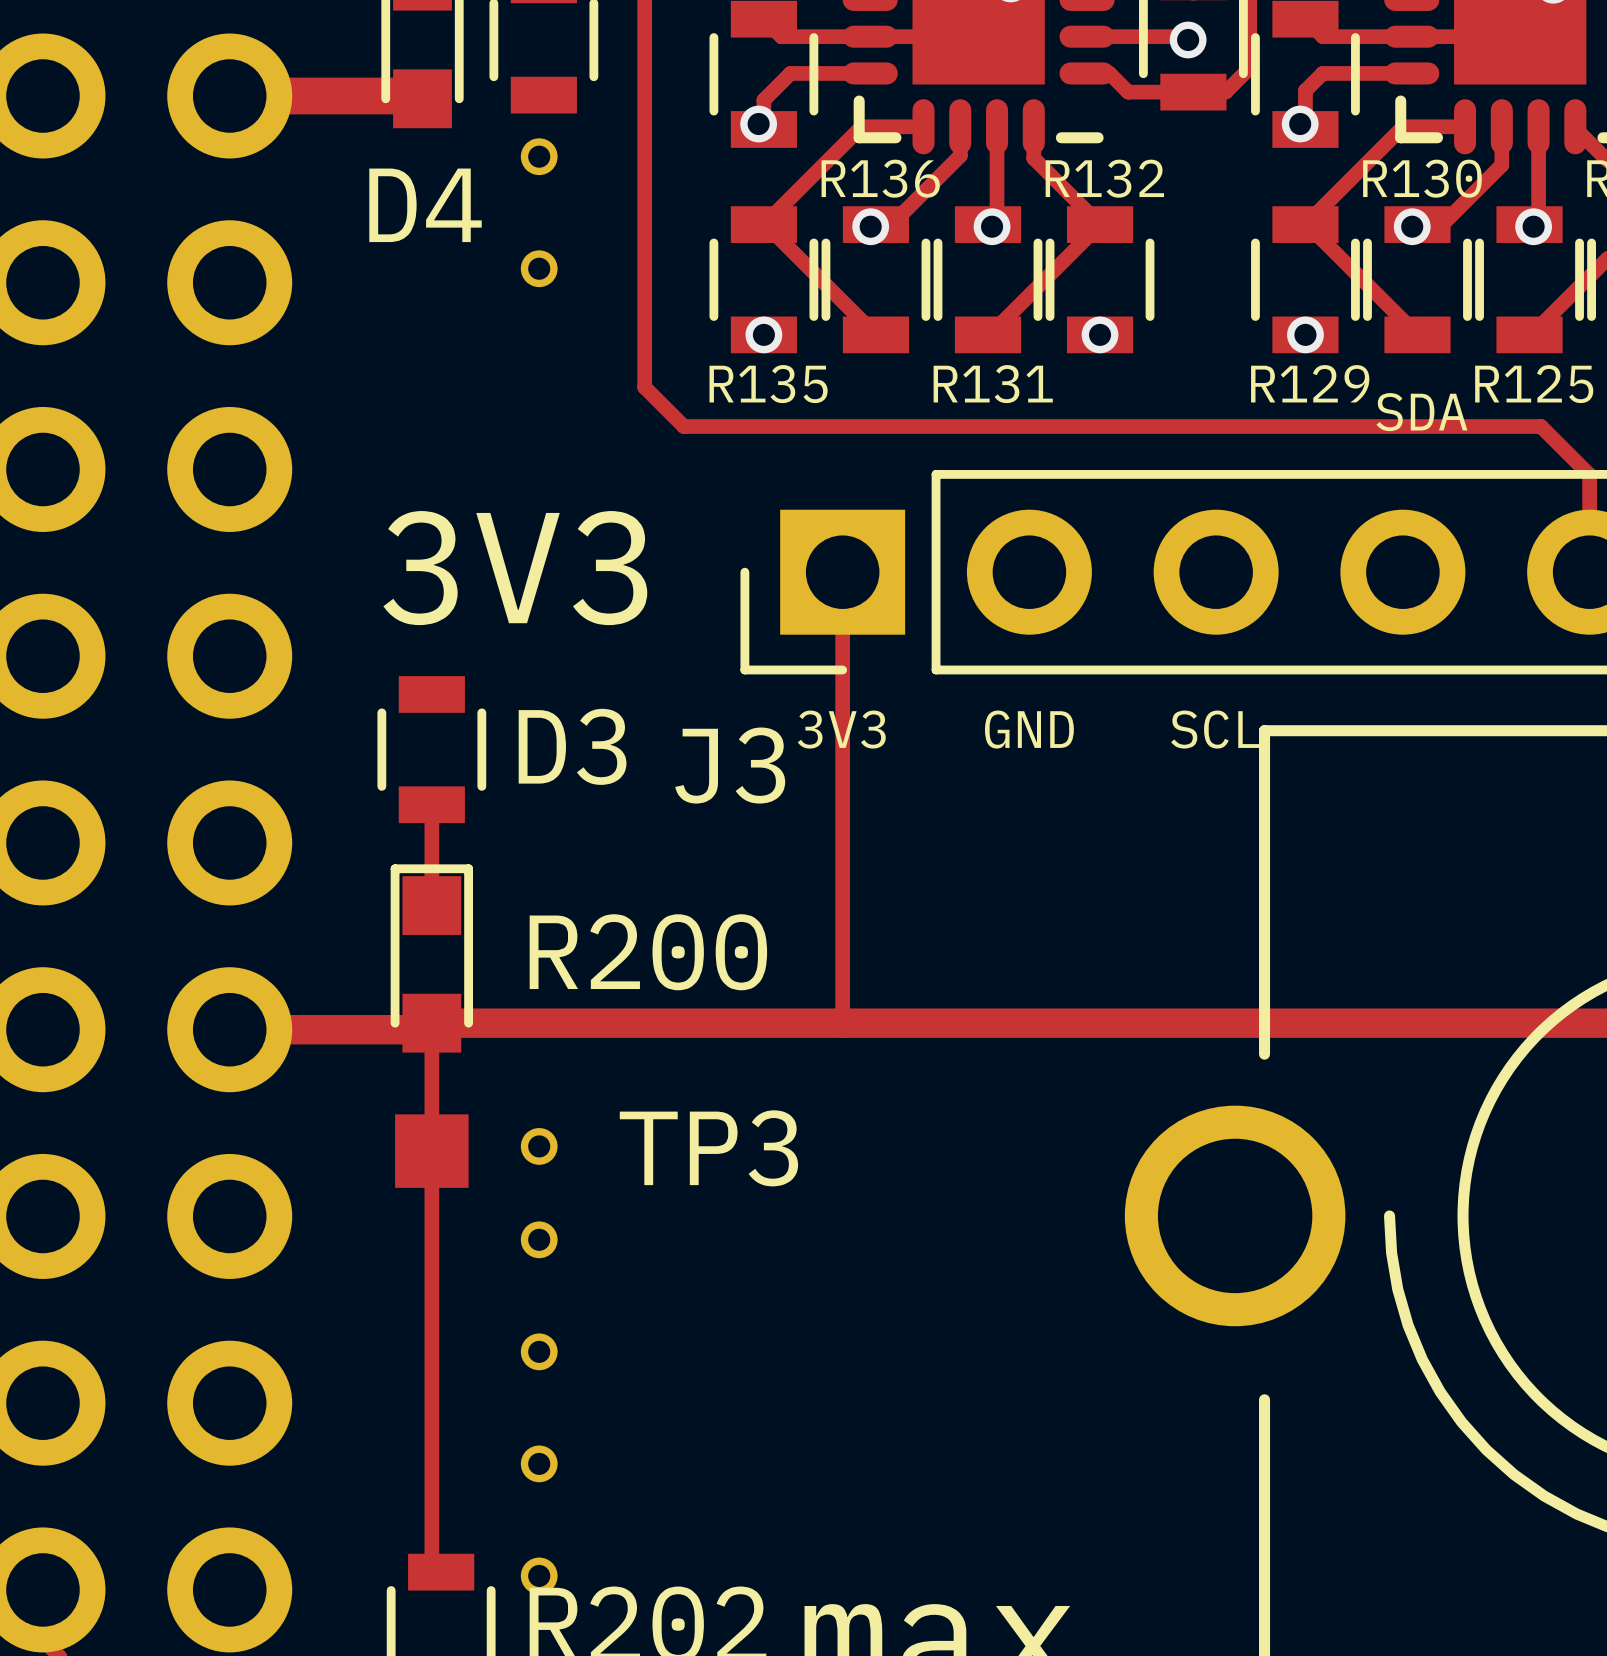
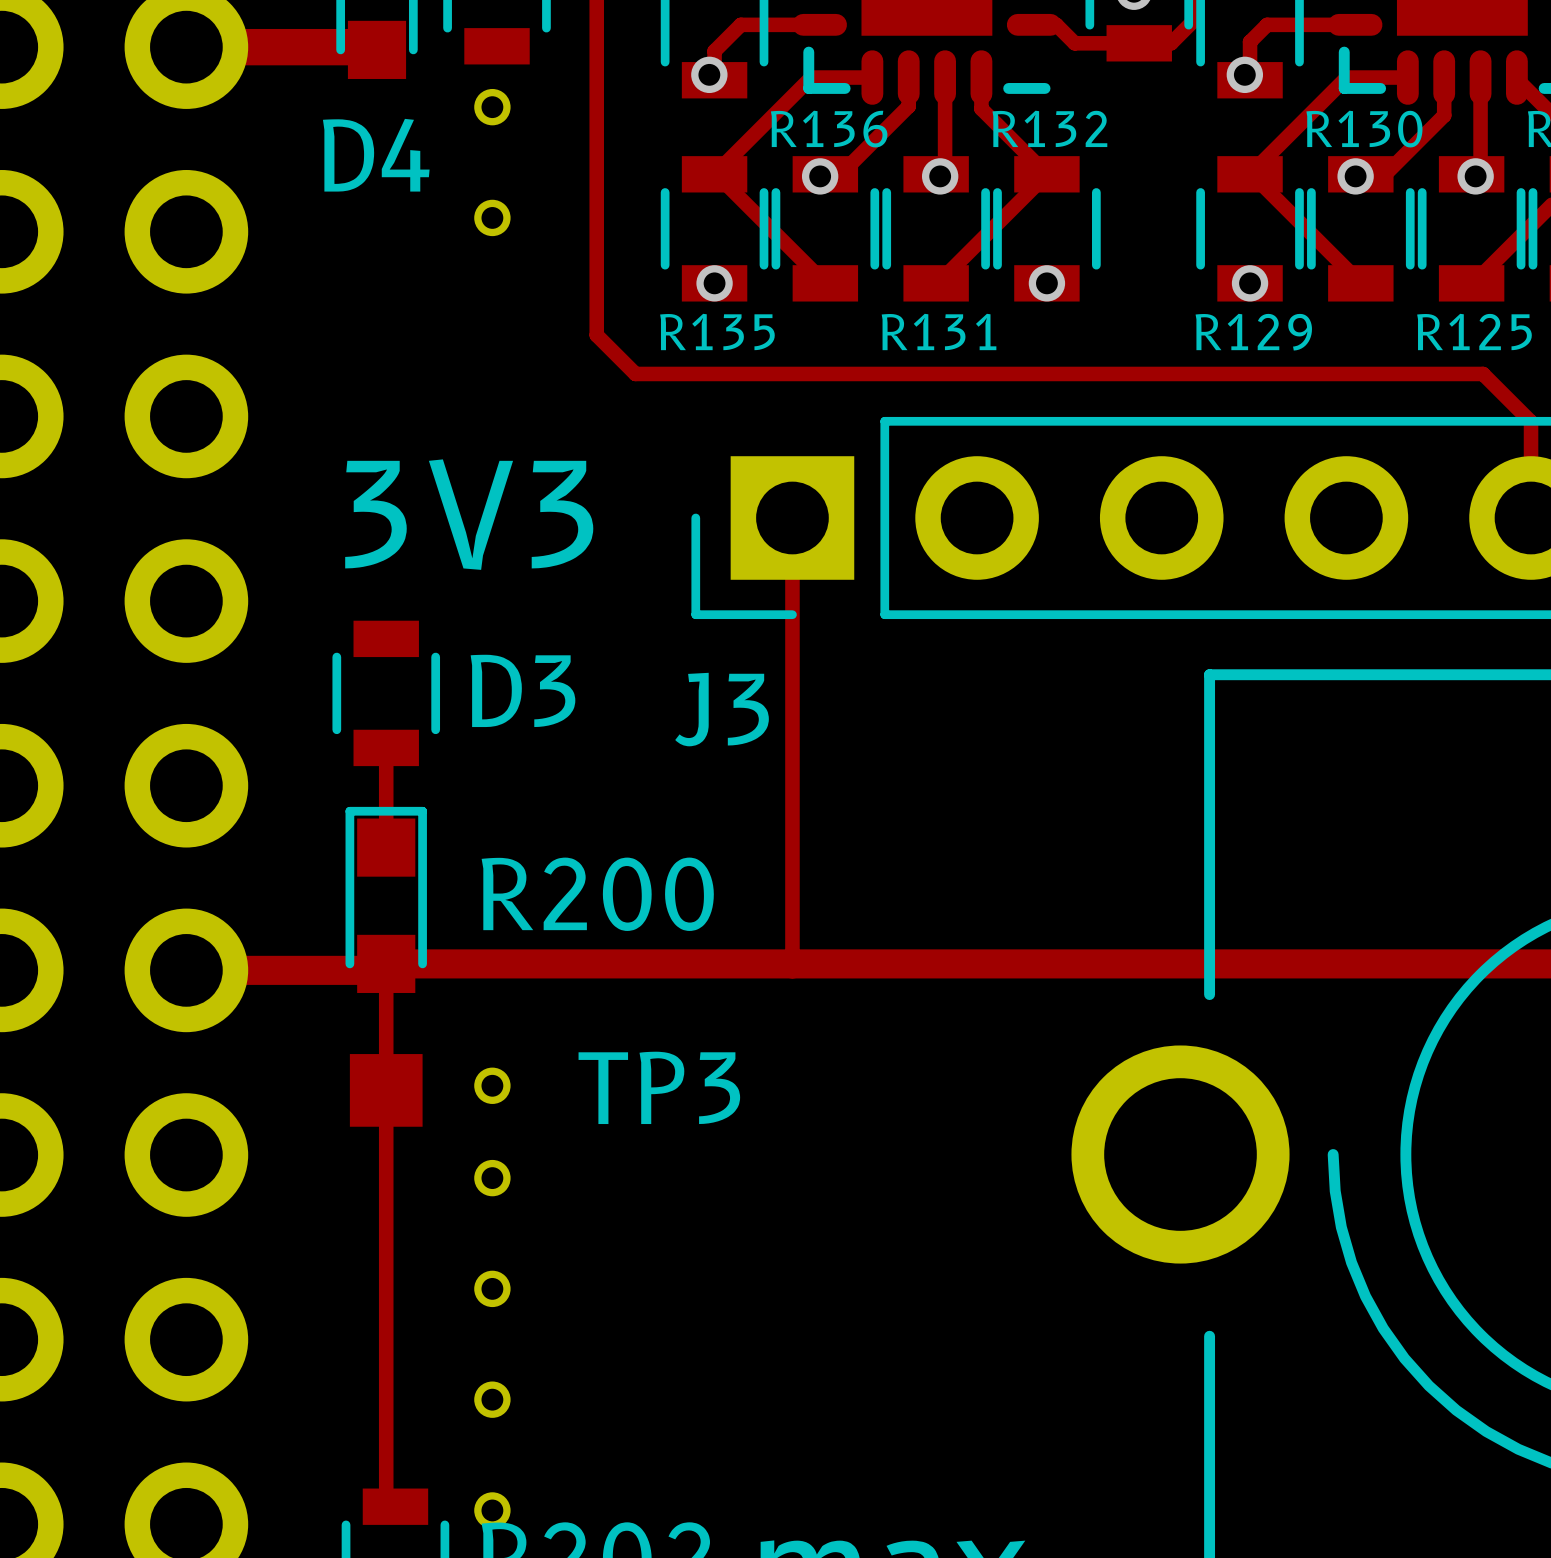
text: SDA (1421, 412) -> none
text: 3V3 (841, 729) -> none
text: GND (1029, 729) -> none
text: SCL (1215, 729) -> none
J3 name position: J3 (730, 765) -> J3 (722, 709)

